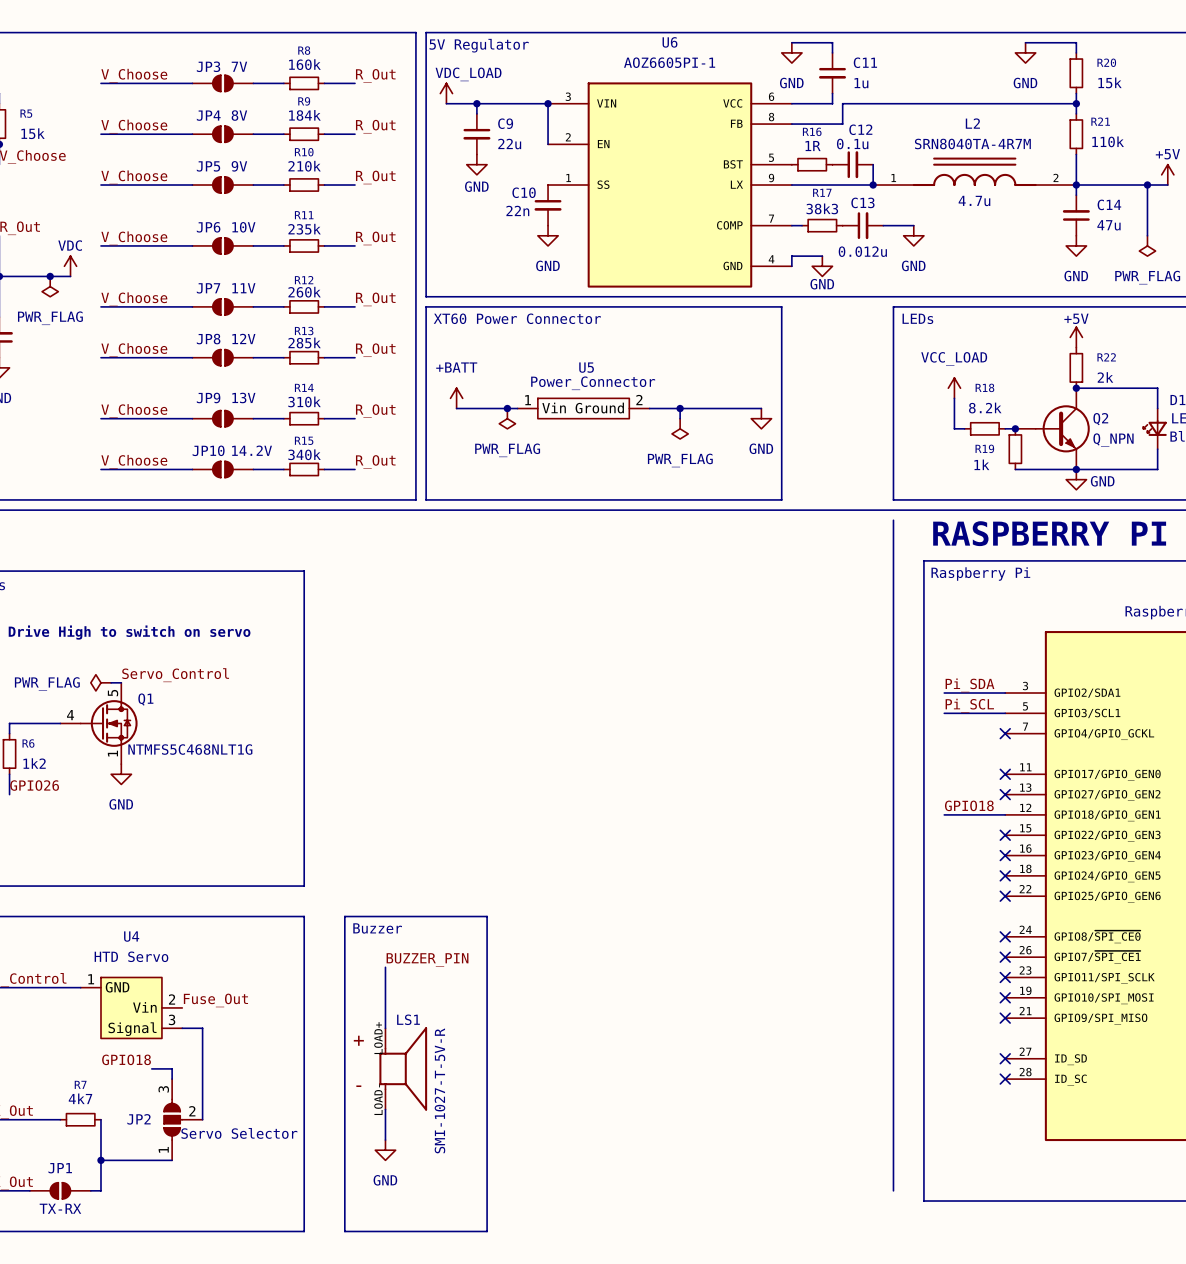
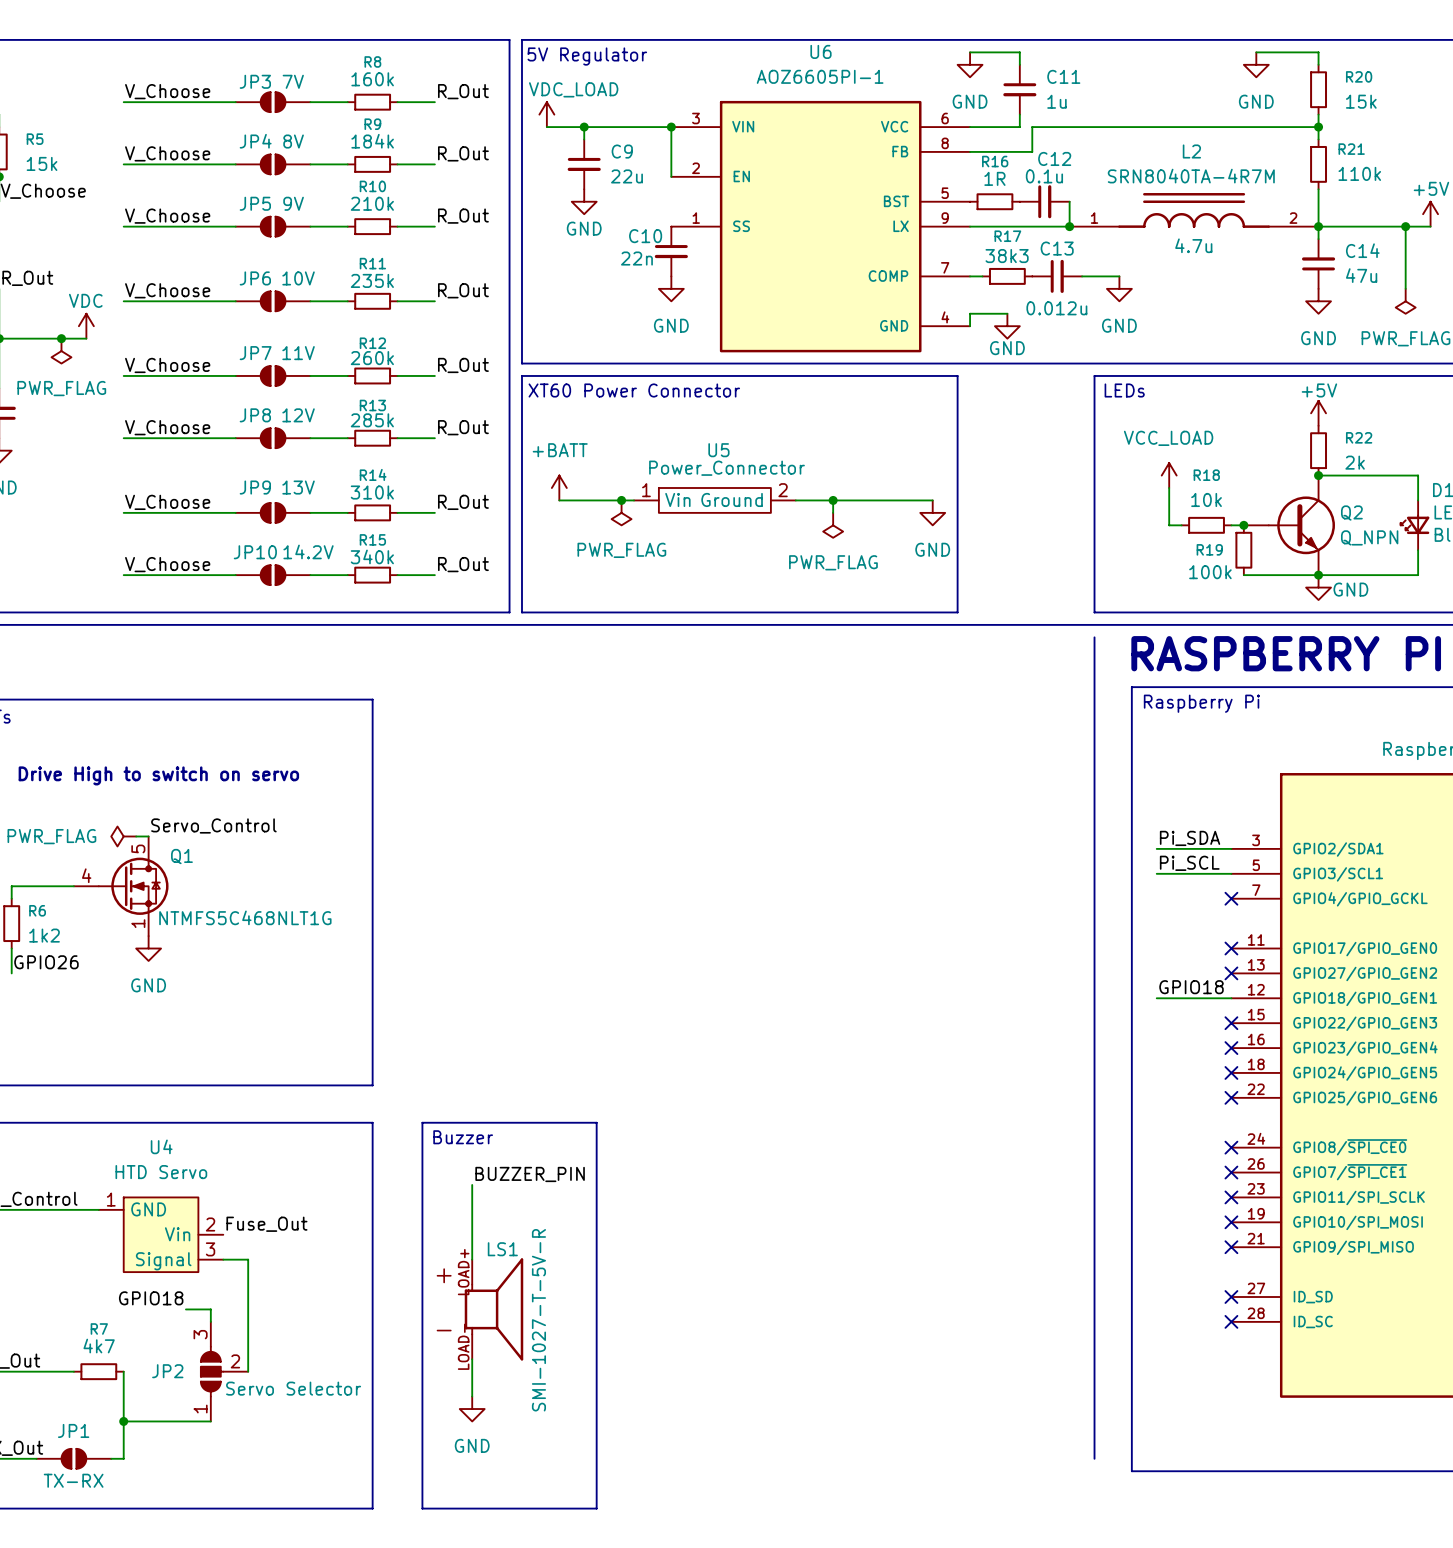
R18 value: 8.2k (985, 408) -> 10k (1206, 499)
R19 value: 1k (981, 464) -> 100k (1210, 572)

